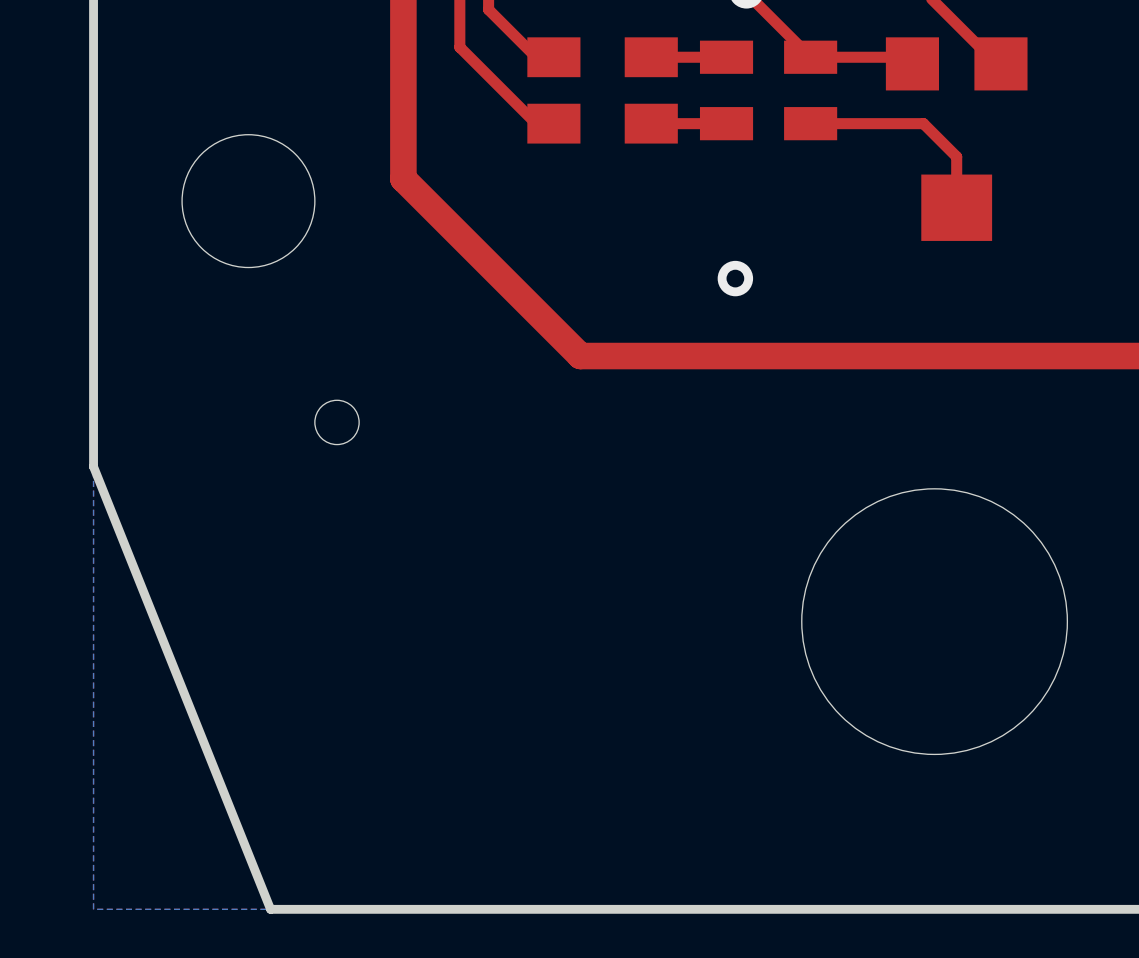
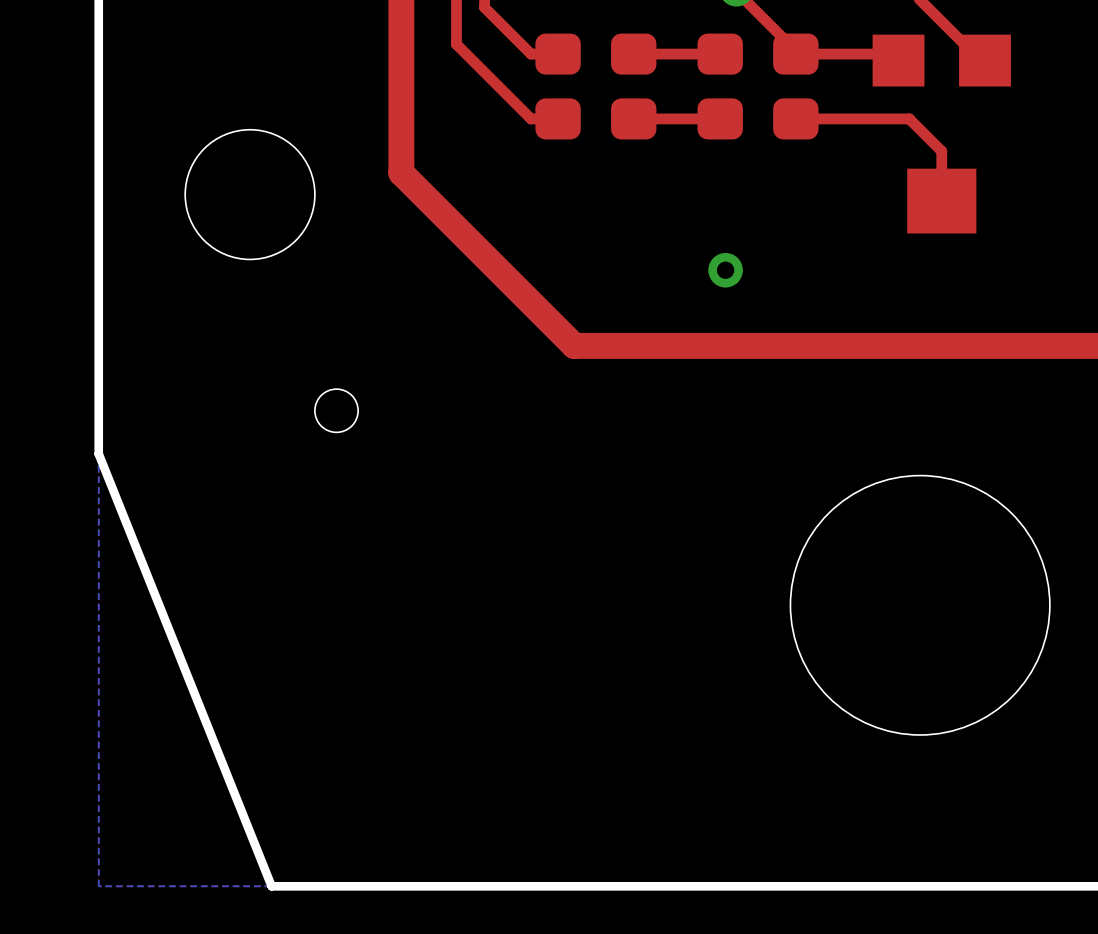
part footprint: [527, 37, 678, 78] -> [535, 33, 657, 75]
part footprint: [699, 40, 838, 74] -> [697, 33, 819, 75]
part footprint: [527, 103, 678, 144] -> [535, 98, 657, 140]
part footprint: [699, 107, 838, 141] -> [697, 98, 819, 140]

